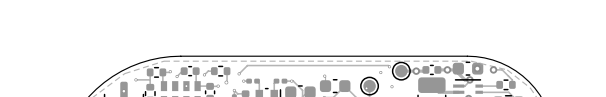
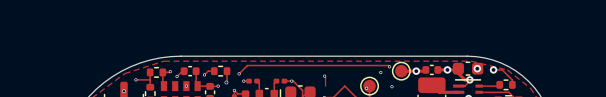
part: (335, 86) -> none

